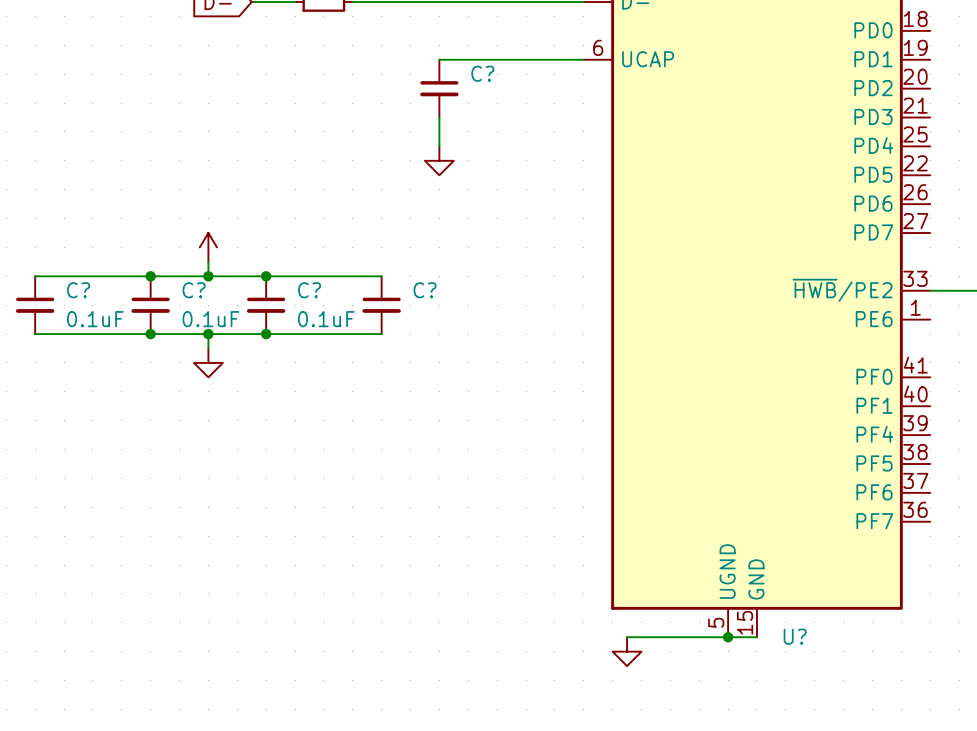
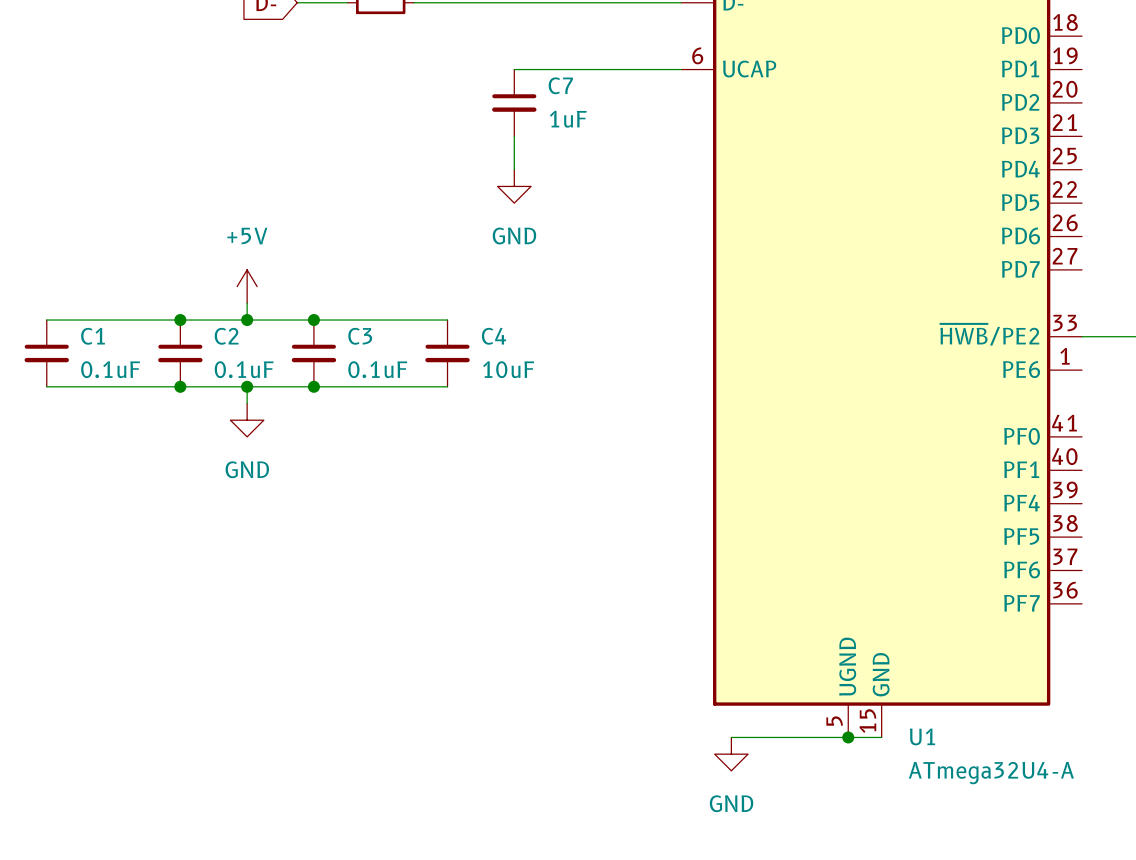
C? name: C? (482, 73) -> C7 (560, 85)
C? value: none -> 1uF (568, 119)
power symbol text: none -> +5V (247, 236)
power symbol text: none -> GND (514, 235)
C? name: C? (78, 290) -> C1 (93, 336)
C? name: C? (194, 290) -> C2 (226, 336)
C? name: C? (309, 290) -> C3 (360, 336)
C? name: C? (425, 290) -> C4 (494, 336)
C? value: none -> 10uF (508, 369)
power symbol text: none -> GND (247, 469)
U? name: U? (795, 636) -> U1 (922, 736)
U? value: none -> ATmega32U4-A (991, 773)
power symbol text: none -> GND (731, 803)

